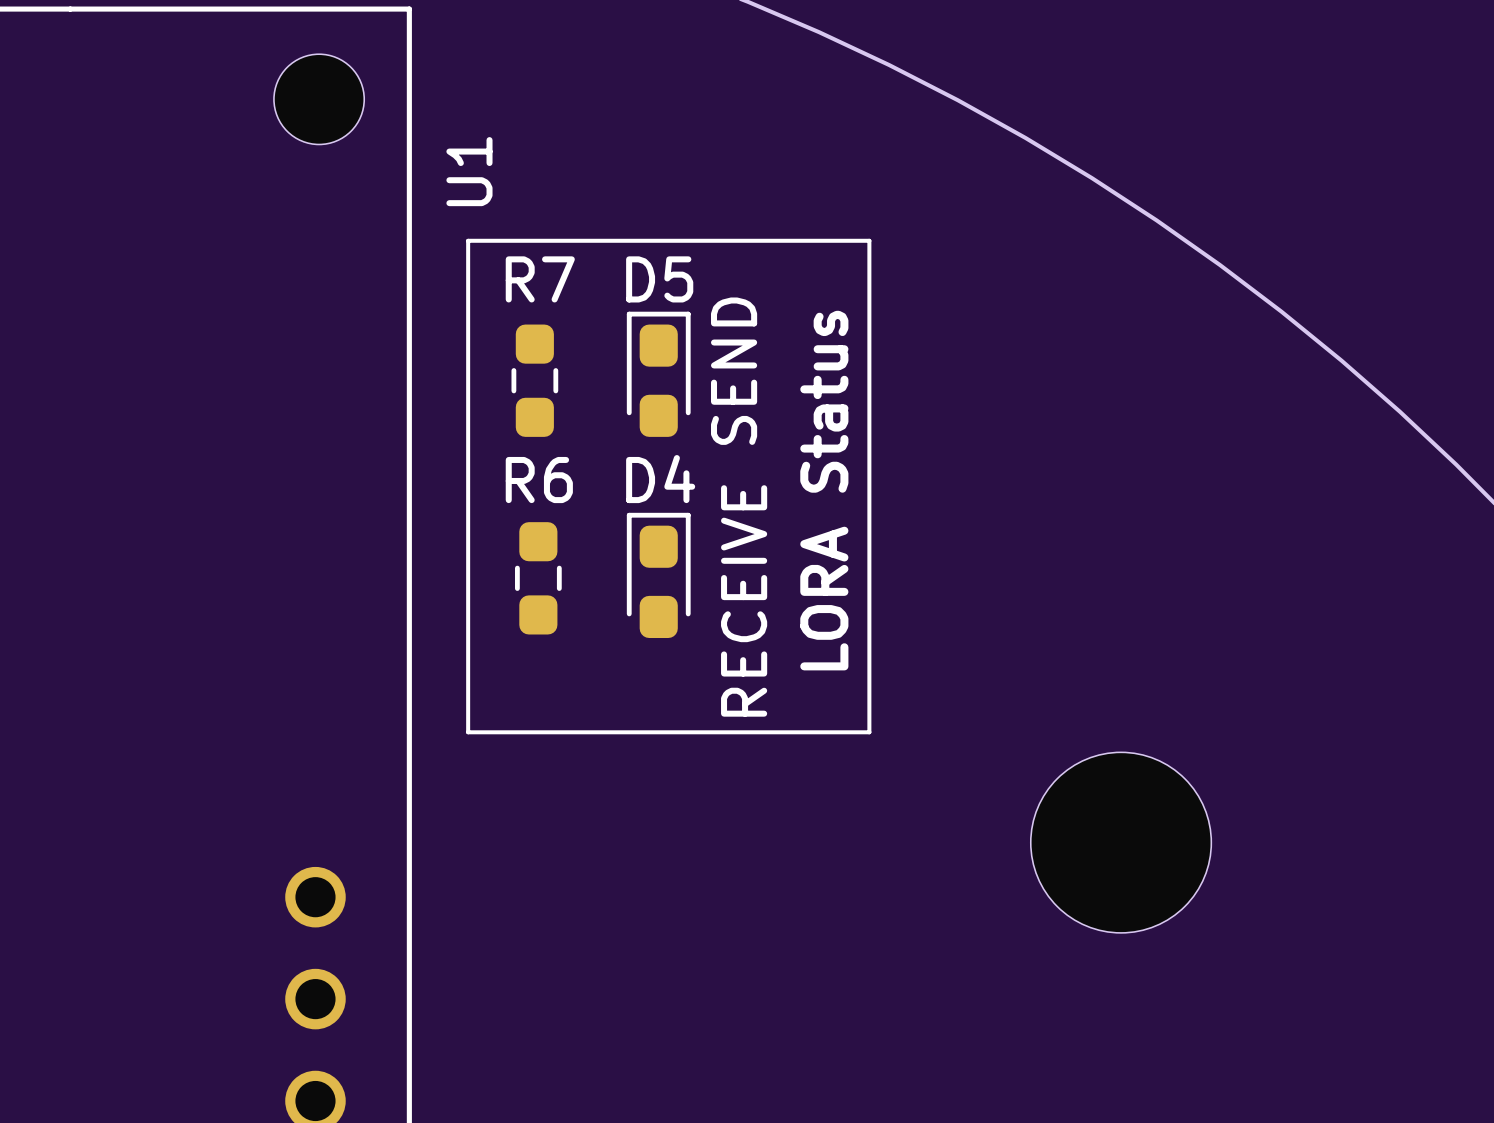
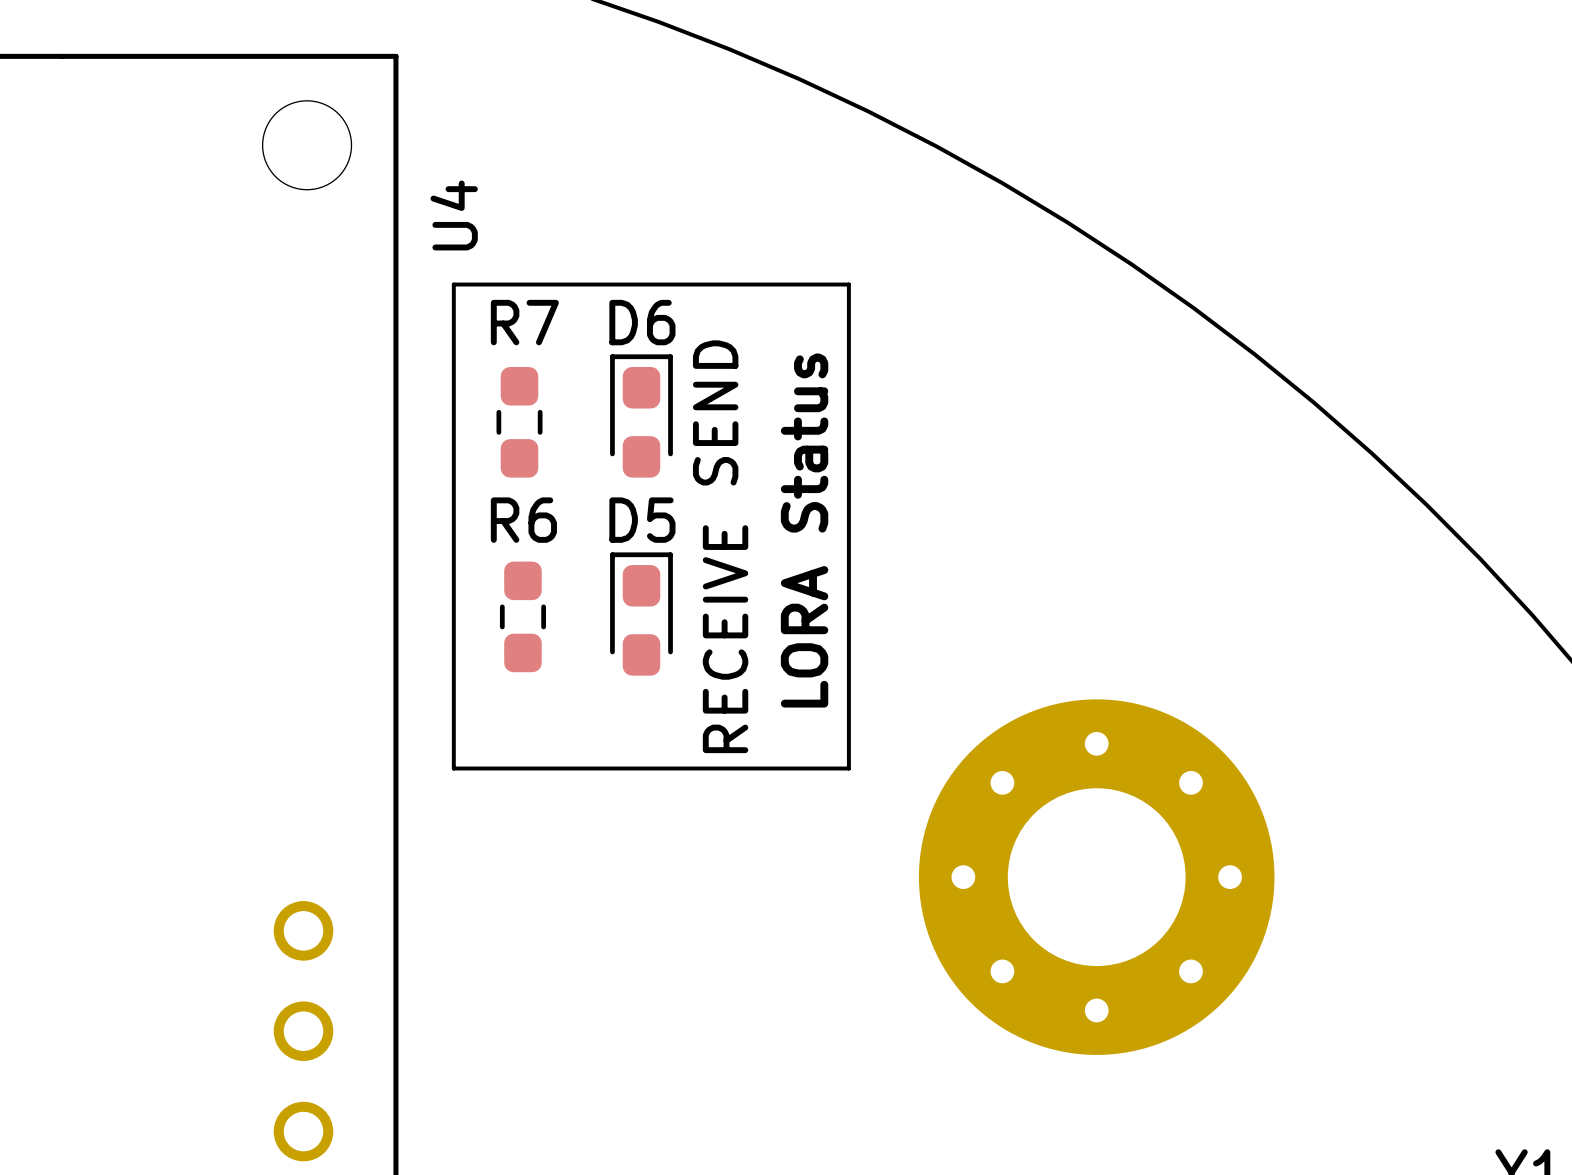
U1 name: U1 (469, 171) -> U4 (454, 215)
D5 name: D5 (659, 279) -> D6 (642, 322)
D4 name: D4 (660, 479) -> D5 (642, 520)
part footprint: [1030, 752, 1212, 933] -> [918, 699, 1275, 1055]

